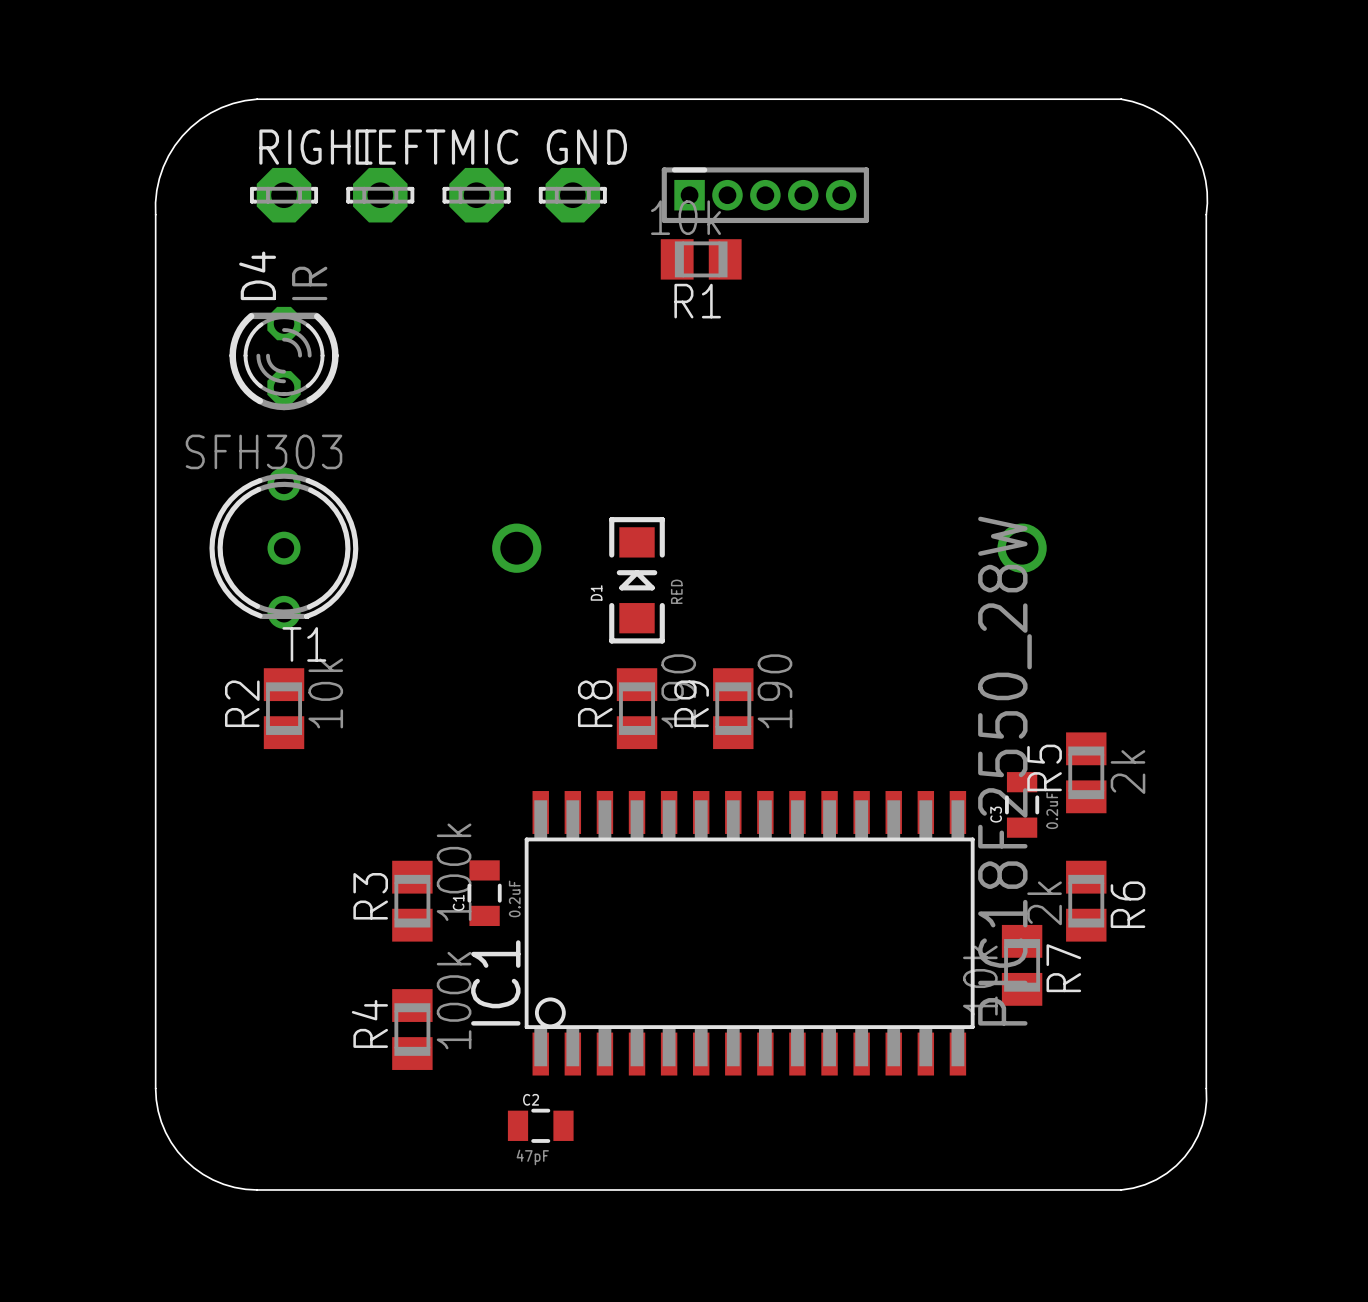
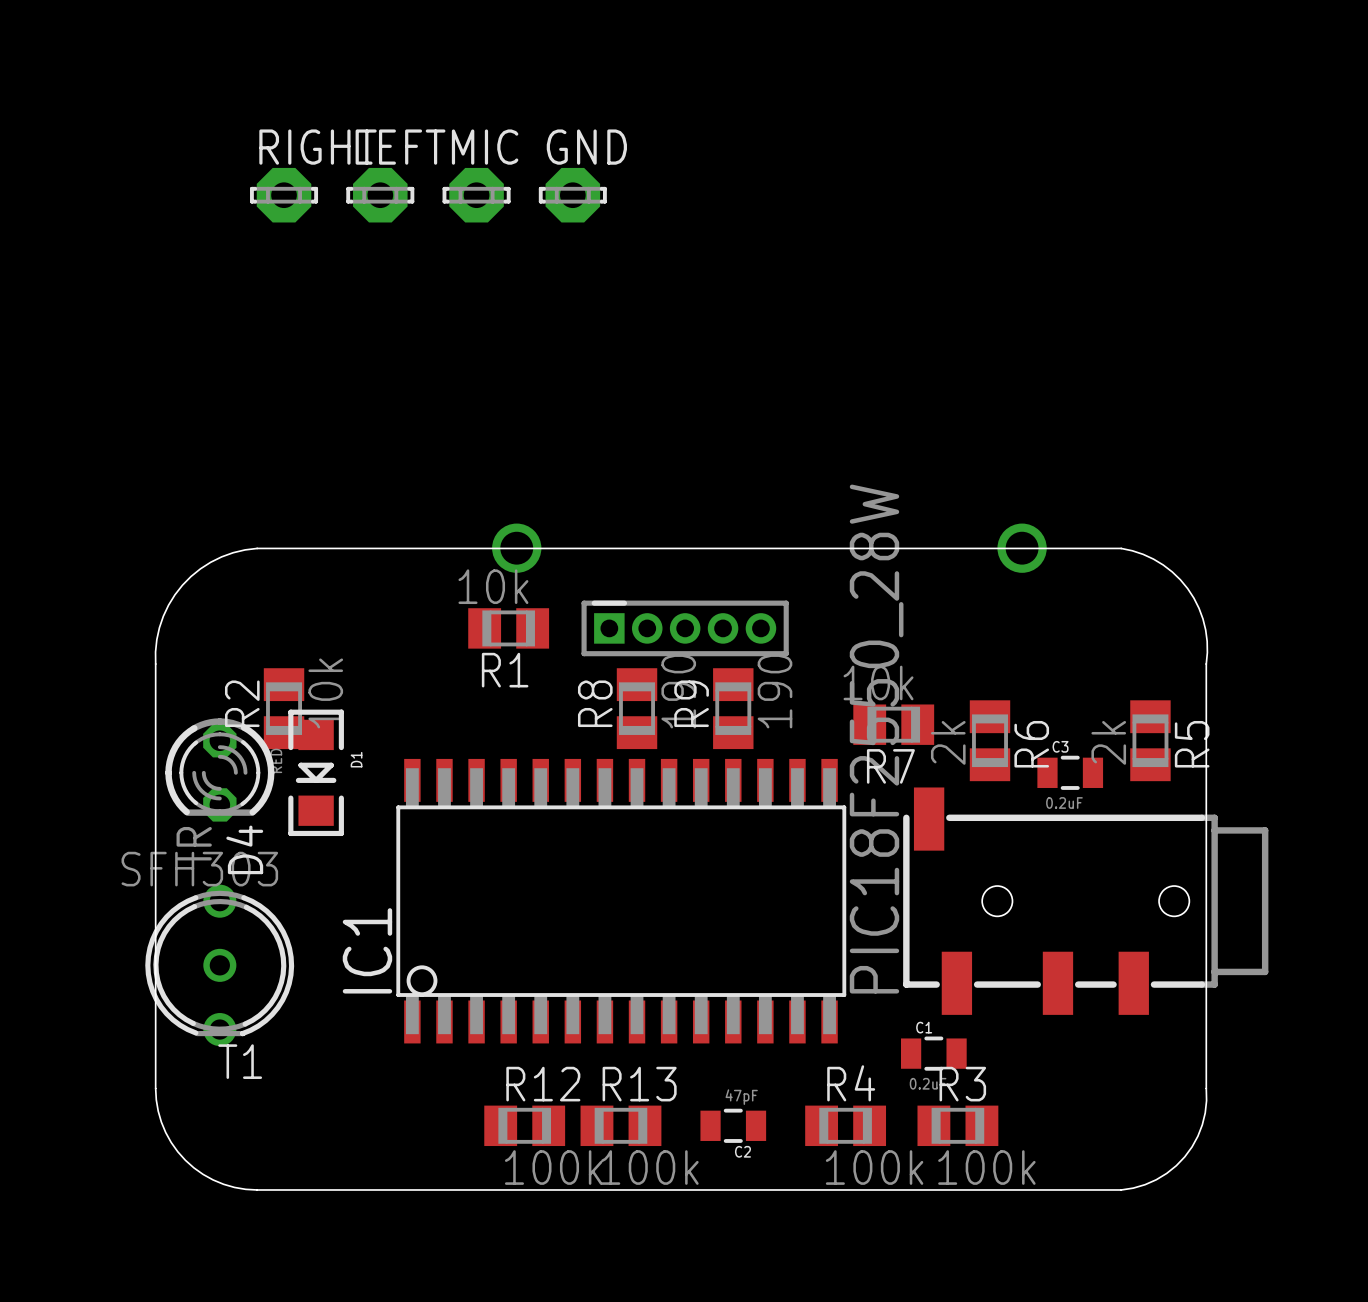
part position: (765, 195) -> (685, 628)
R1 position: (701, 259) -> (508, 628)
D4 rotation: 0° (284, 358) -> 180° (219, 769)
D4 position: (284, 358) -> (219, 769)
T1 position: (283, 548) -> (219, 965)
D1 rotation: 0° (637, 580) -> 180° (316, 772)
D1 position: (637, 580) -> (316, 772)
board edge: (155, 664) (156, 190) (168, 155) (191, 127) (221, 107) (257, 99) (1121, 99) (1153, 109) (1180, 130) (1193, 148) (1202, 169) (1207, 192) (1206, 664) -> (155, 664) (156, 639) (163, 616) (182, 585) (210, 562) (233, 552) (257, 548) (1121, 548) (1143, 554) (1163, 564) (1187, 588) (1199, 608) (1205, 630) (1206, 664)
R5 name position: R5 (1044, 767) -> R5 (1192, 744)
R5 position: (1086, 772) -> (1150, 740)
R5 value position: 2k (1127, 772) -> 2k (1108, 742)
C3 rotation: 0° (1022, 804) -> 90° clockwise (1070, 772)
C3 position: (1022, 804) -> (1070, 772)
C1 rotation: 0° (484, 893) -> 90° clockwise (933, 1053)
C1 position: (484, 893) -> (933, 1053)
R3 rotation: 0° (412, 901) -> 90° clockwise (957, 1125)
R3 position: (412, 901) -> (957, 1125)
part: none -> (1085, 901)
R6 position: (1086, 901) -> (990, 740)
IC1 position: (749, 933) -> (621, 901)
R7 rotation: 0° (1022, 965) -> 90° clockwise (893, 724)
R7 position: (1022, 965) -> (893, 724)
R4 rotation: 0° (412, 1029) -> 90° clockwise (845, 1125)
R4 position: (412, 1029) -> (845, 1125)
C2 name position: C2 (531, 1099) -> C2 (742, 1151)
R12: none -> 100k (524, 1125)
C2 position: (540, 1125) -> (733, 1125)
R13: none -> 100k (620, 1125)
C2 value position: 47pF (532, 1157) -> 47pF (741, 1097)

